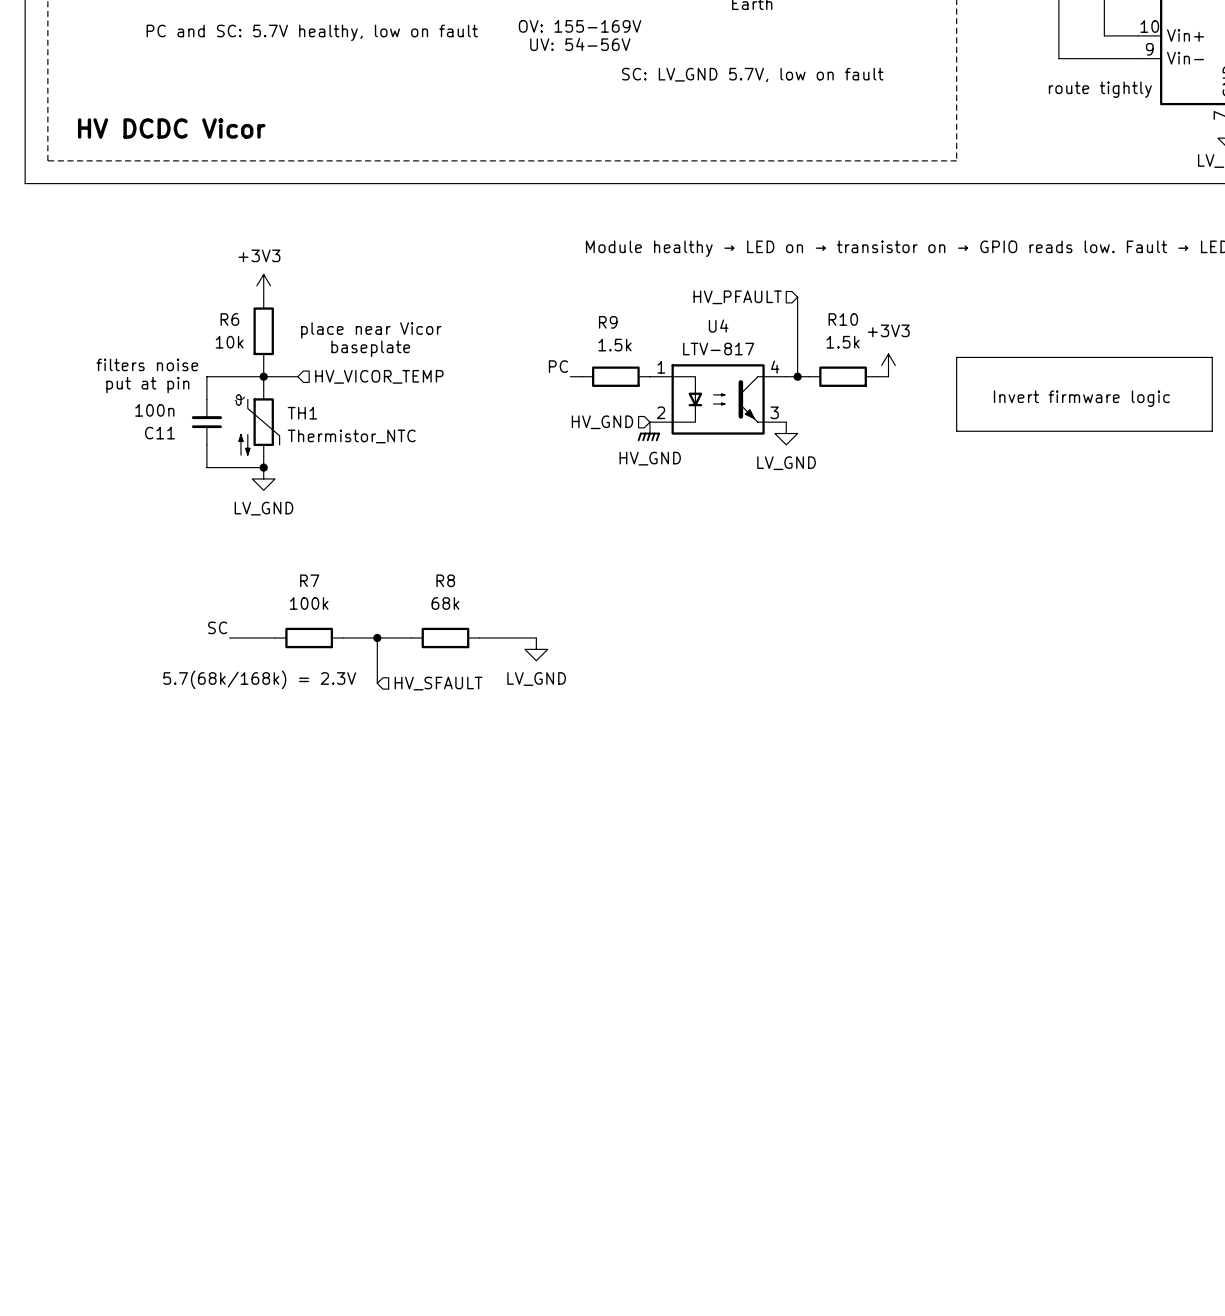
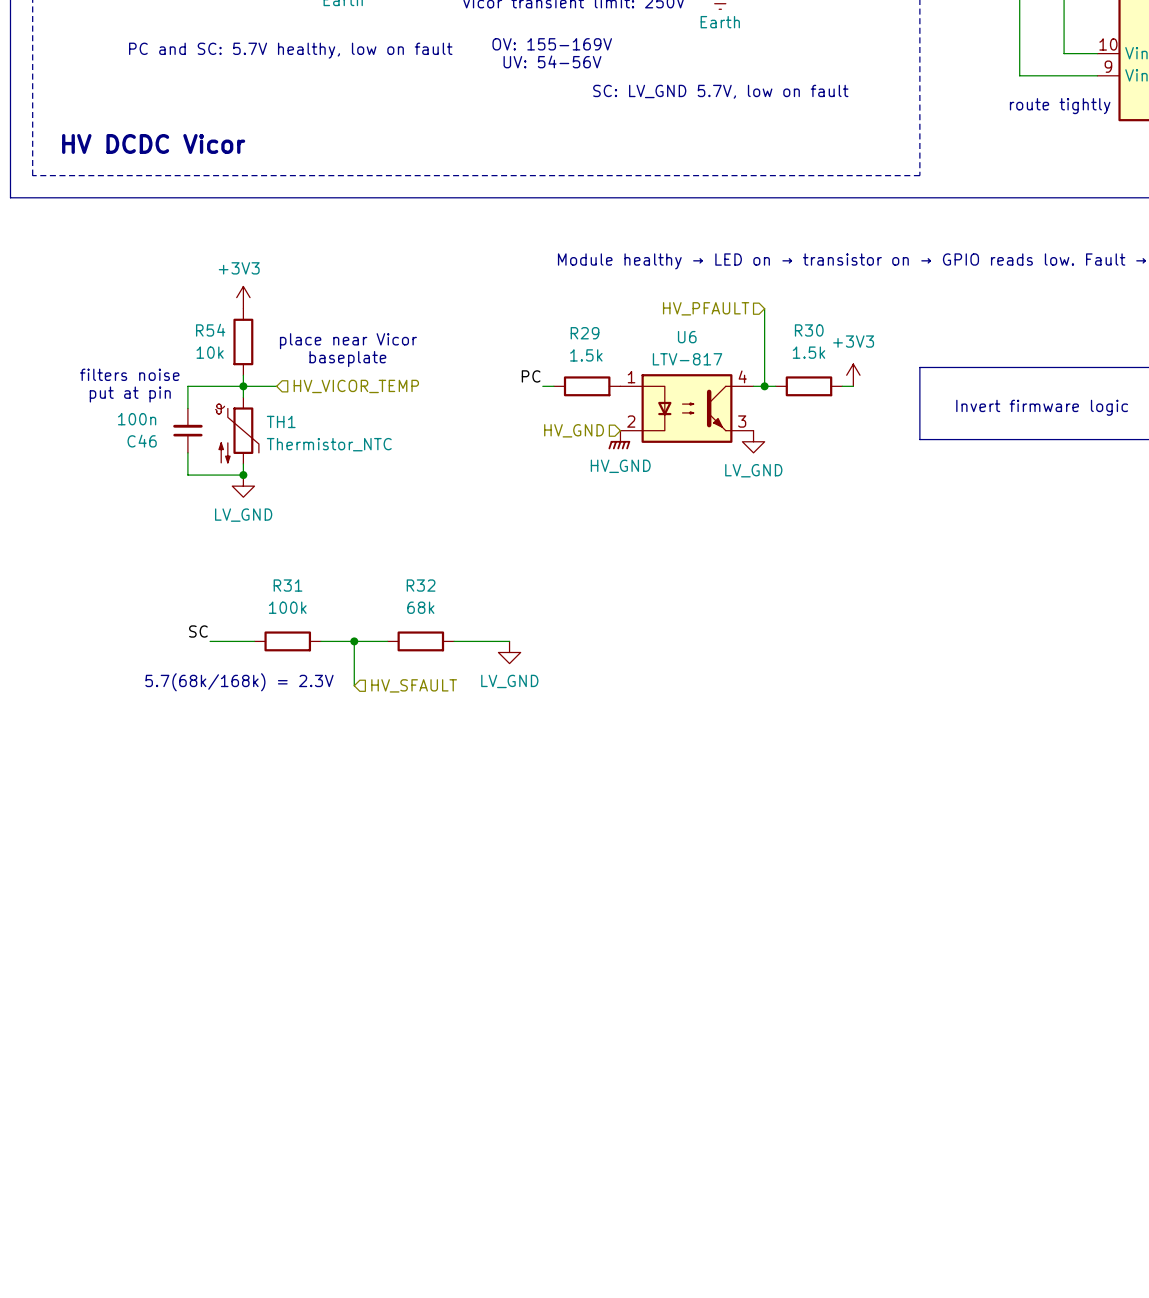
R6 name: R6 (229, 319) -> R54 (210, 330)
R10 name: R10 (843, 319) -> R30 (809, 330)
R9 name: R9 (608, 322) -> R29 (585, 333)
U4 name: U4 (718, 326) -> U6 (687, 337)
C11 name: C11 (159, 433) -> C46 (142, 441)
R7 name: R7 (309, 580) -> R31 (288, 585)
R8 name: R8 (445, 580) -> R32 (421, 585)

